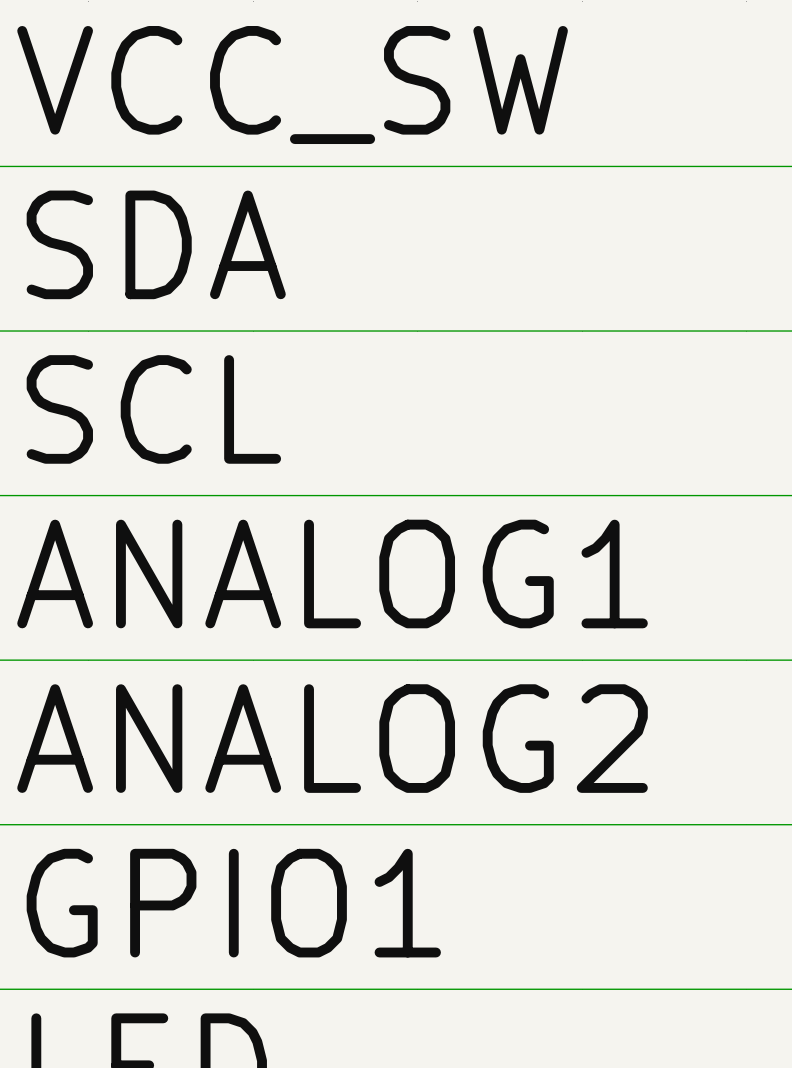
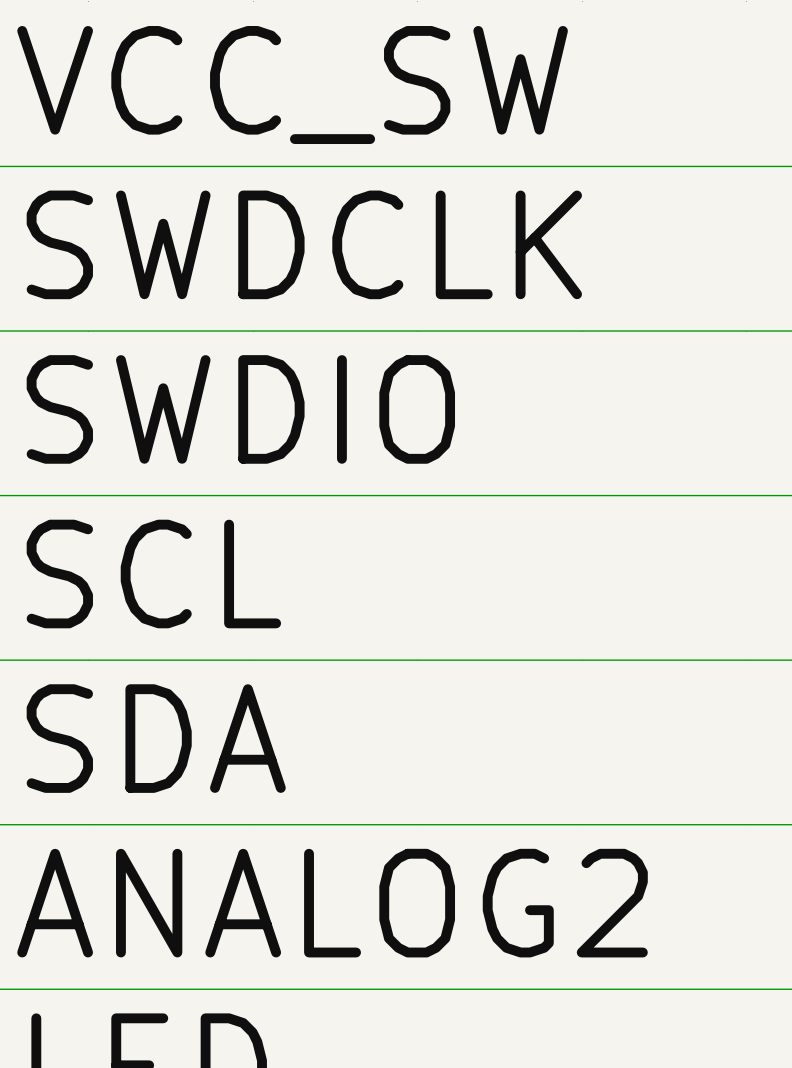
label: SDA (156, 244) -> SWDCLK (304, 244)
label: SCL (153, 409) -> SWDIO (240, 409)
label: ANALOG1 (332, 574) -> SCL (153, 574)
label: ANALOG2 (332, 738) -> SDA (156, 738)
label: GPIO1 (233, 903) -> ANALOG2 (332, 903)

